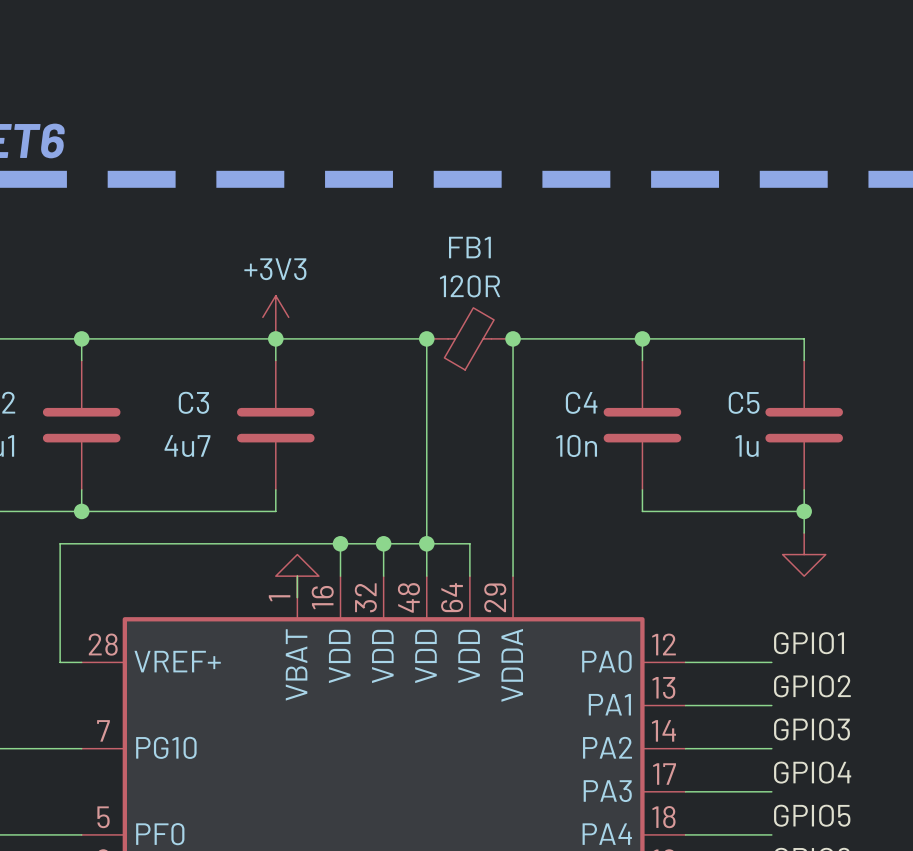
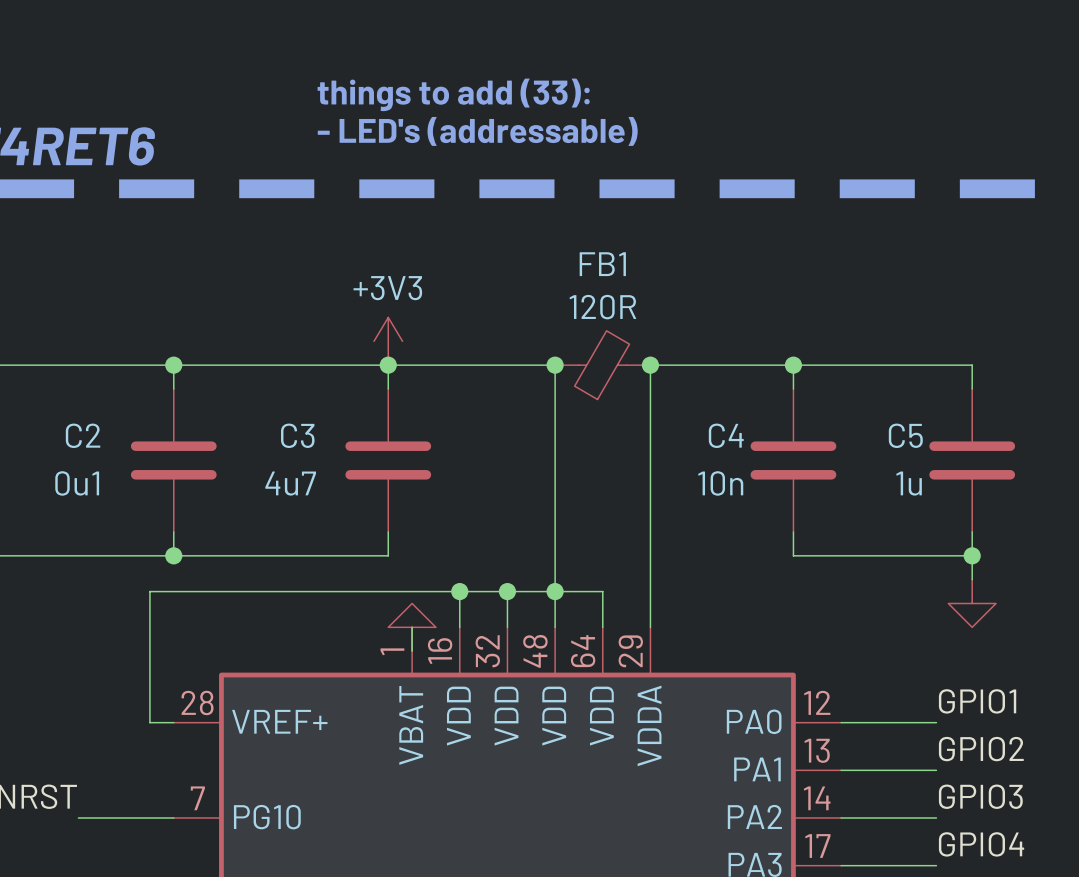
text: none -> things to add (33): (453, 94)
text: none -> - LED's (addressable) (477, 131)

